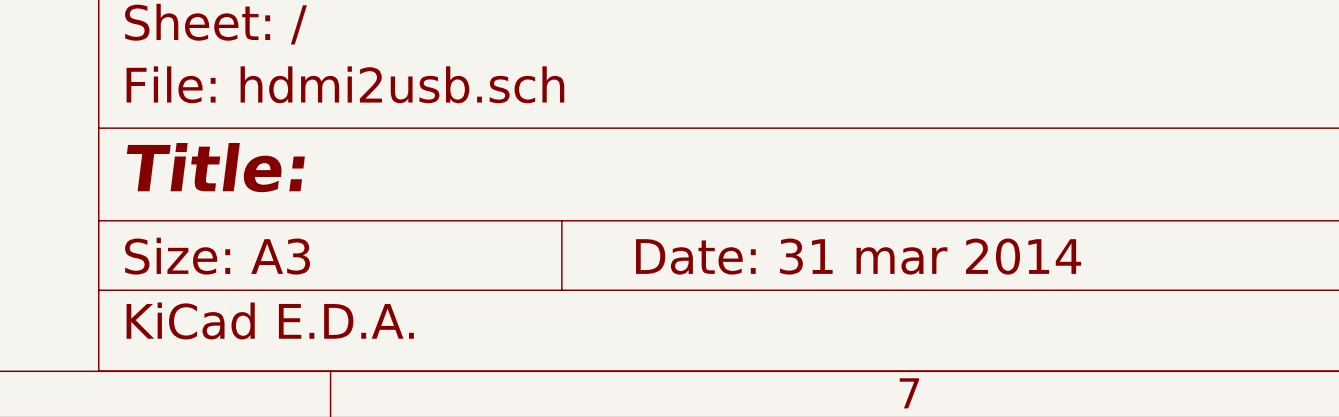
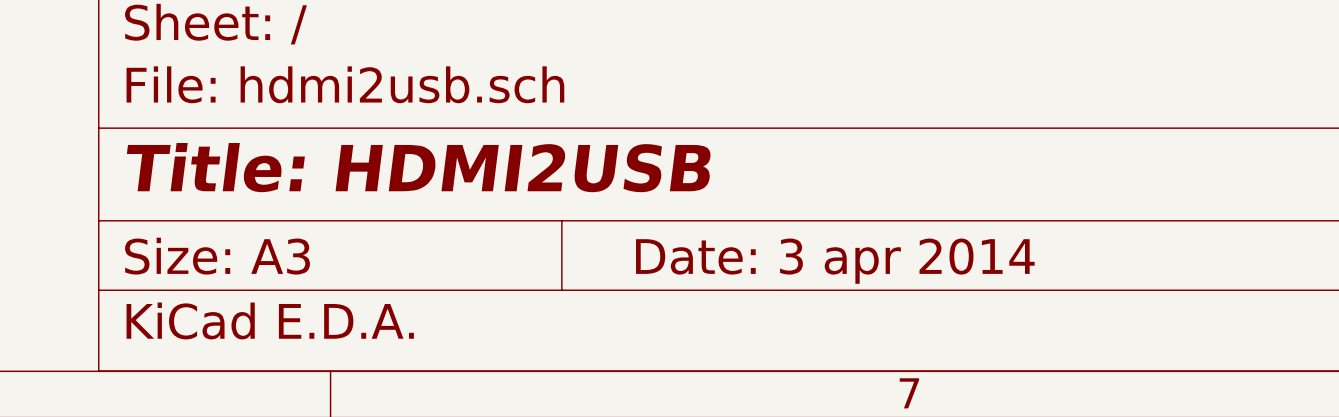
title block: Title: (215, 167) -> Title: HDMI2USB (419, 167)
title block: Date: 31 mar 2014 (858, 256) -> Date: 3 apr 2014 (835, 261)

